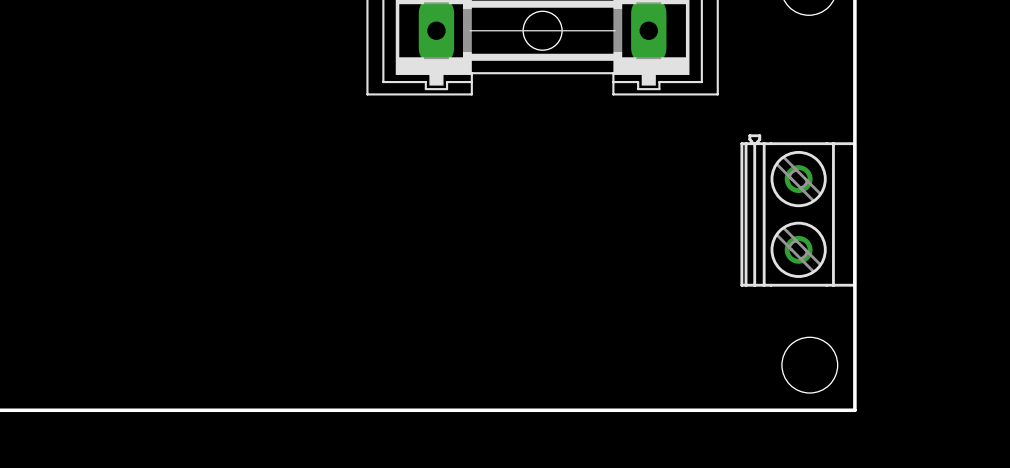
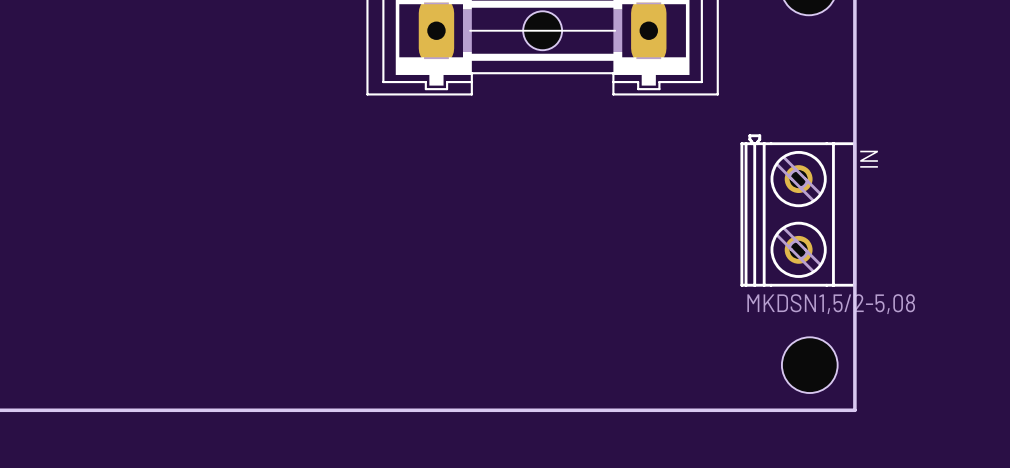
IN name: none -> IN (869, 159)
IN value: none -> MKDSN1,5/2-5,08 (831, 304)

